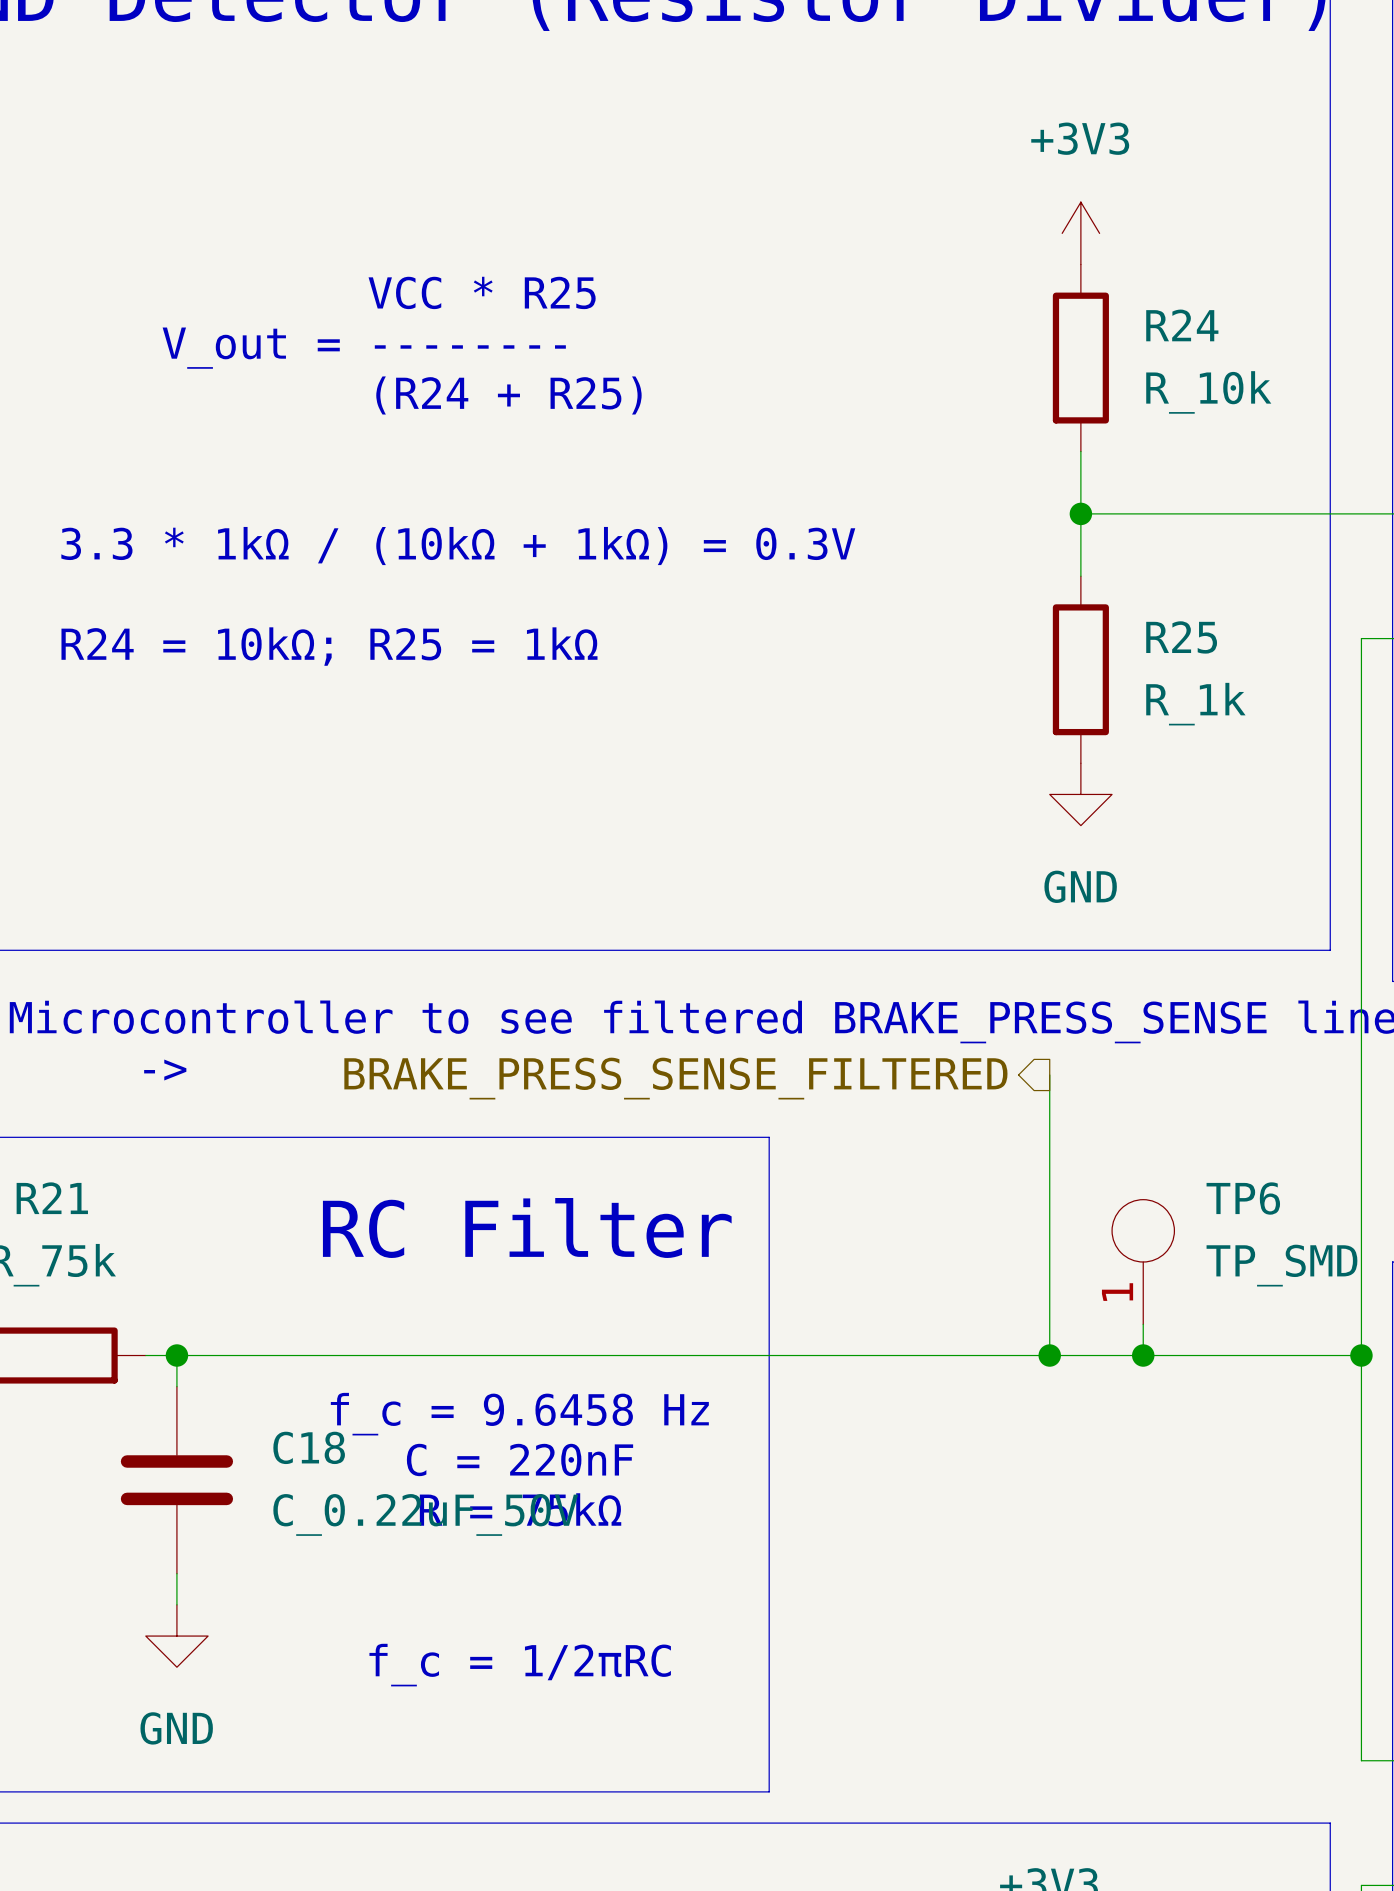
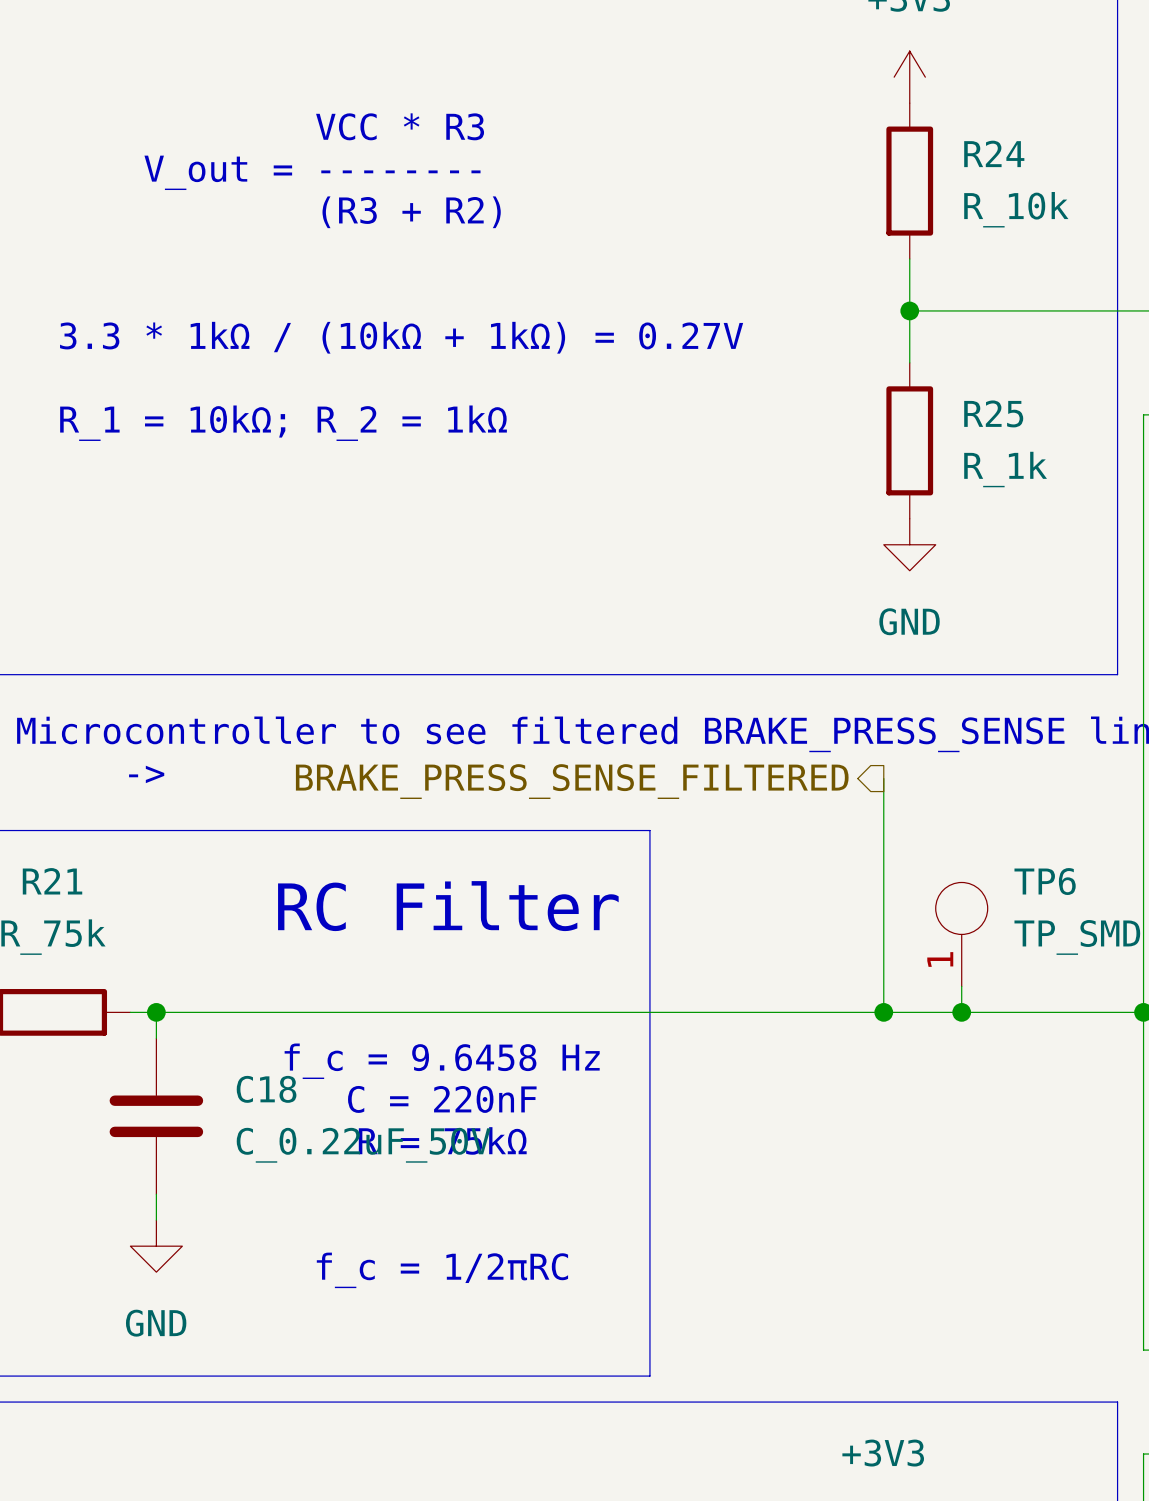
text: VCC * R25 (482, 292) -> VCC * R3 (400, 126)
text: (R24 + R25) (508, 395) -> (R3 + R2) (411, 212)
text: 3.3 * 1kΩ / (10kΩ + 1kΩ) = 0.3V (458, 546) -> 3.3 * 1kΩ / (10kΩ + 1kΩ) = 0.27V (401, 337)
text: R24 = 10kΩ; R25 = 1kΩ (329, 646) -> R_1 = 10kΩ; R_2 = 1kΩ (283, 423)

